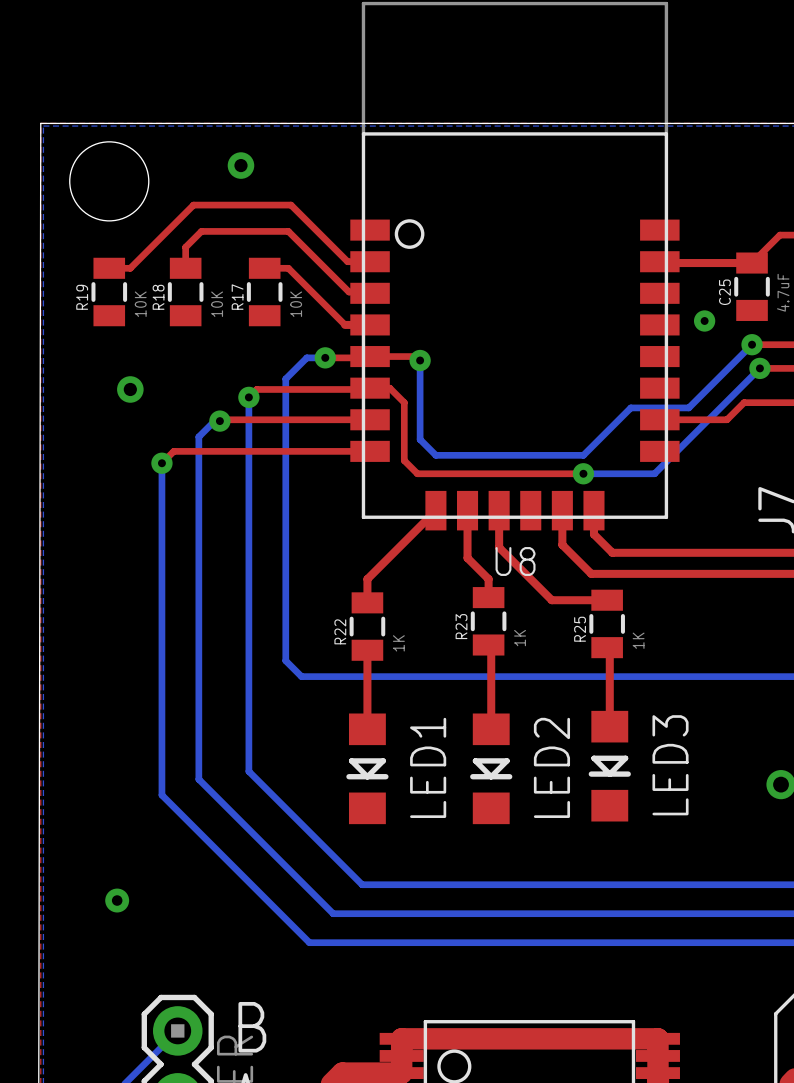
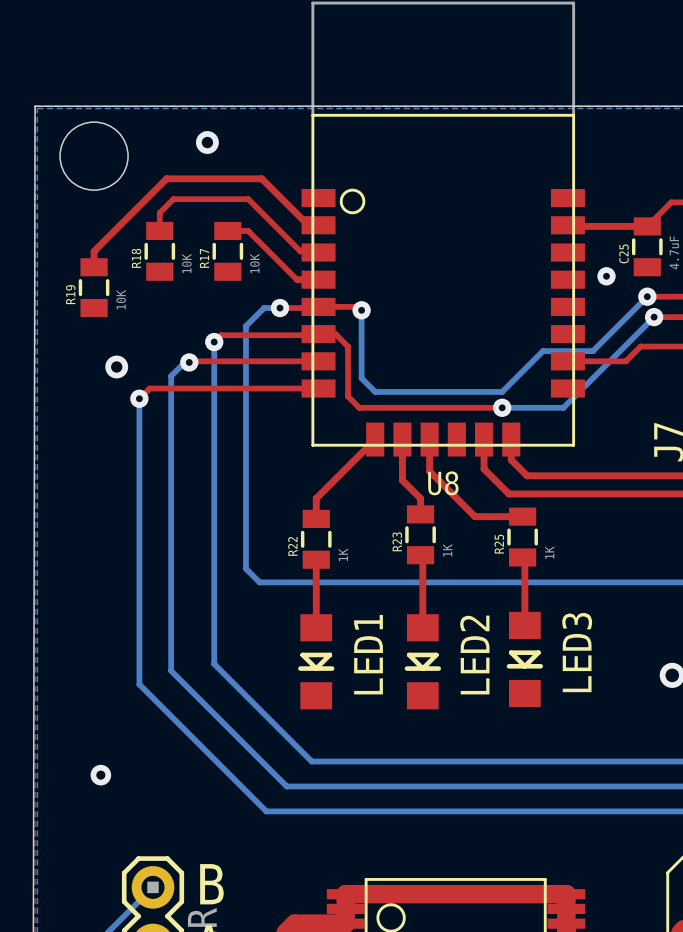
top track: (358, 261) (347, 261) (291, 205) (193, 205) (130, 268) (109, 268) -> (308, 225) (261, 178) (166, 178) (94, 251) (94, 267)
R19 position: (109, 292) -> (94, 287)
via position: (130, 389) -> (116, 366)

